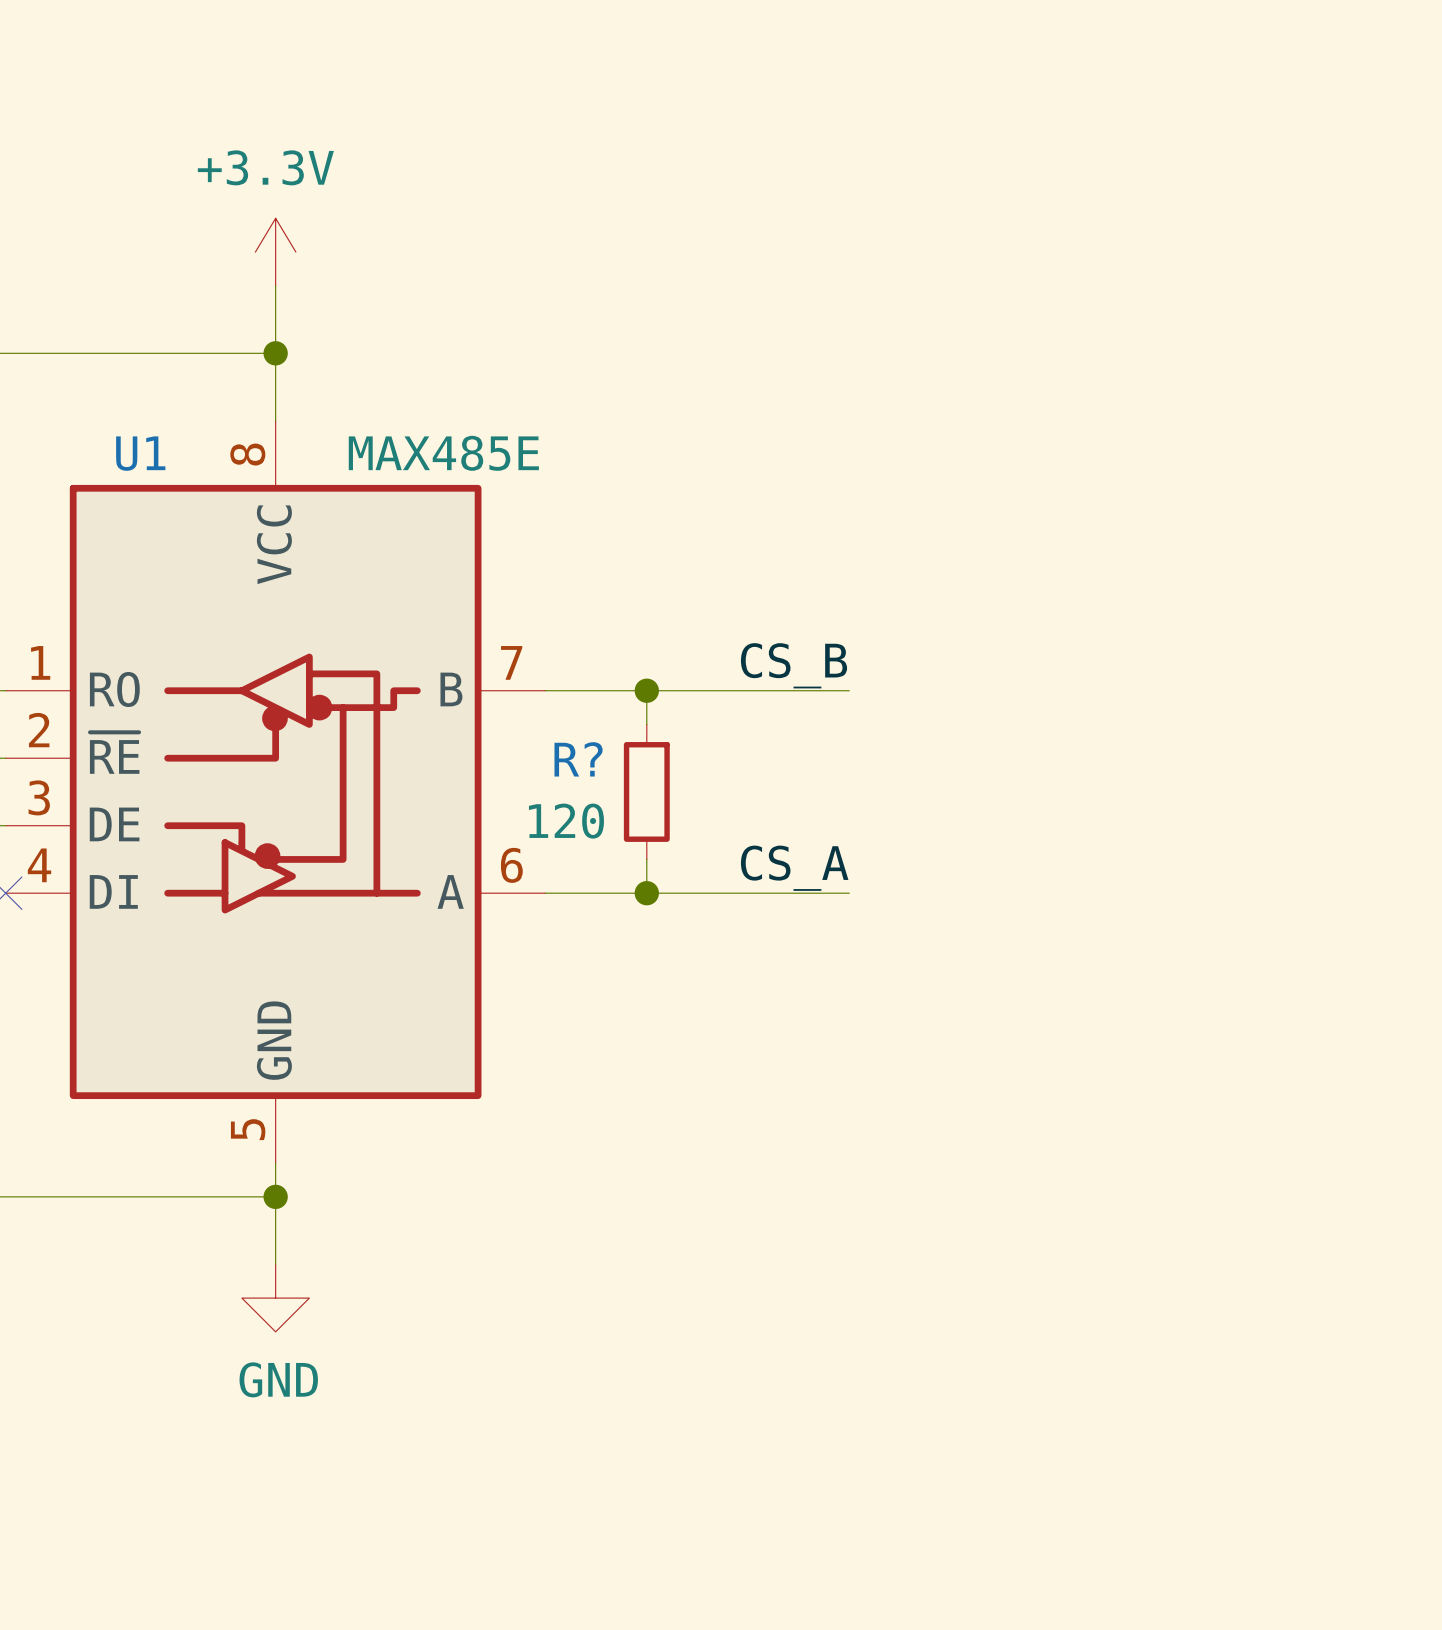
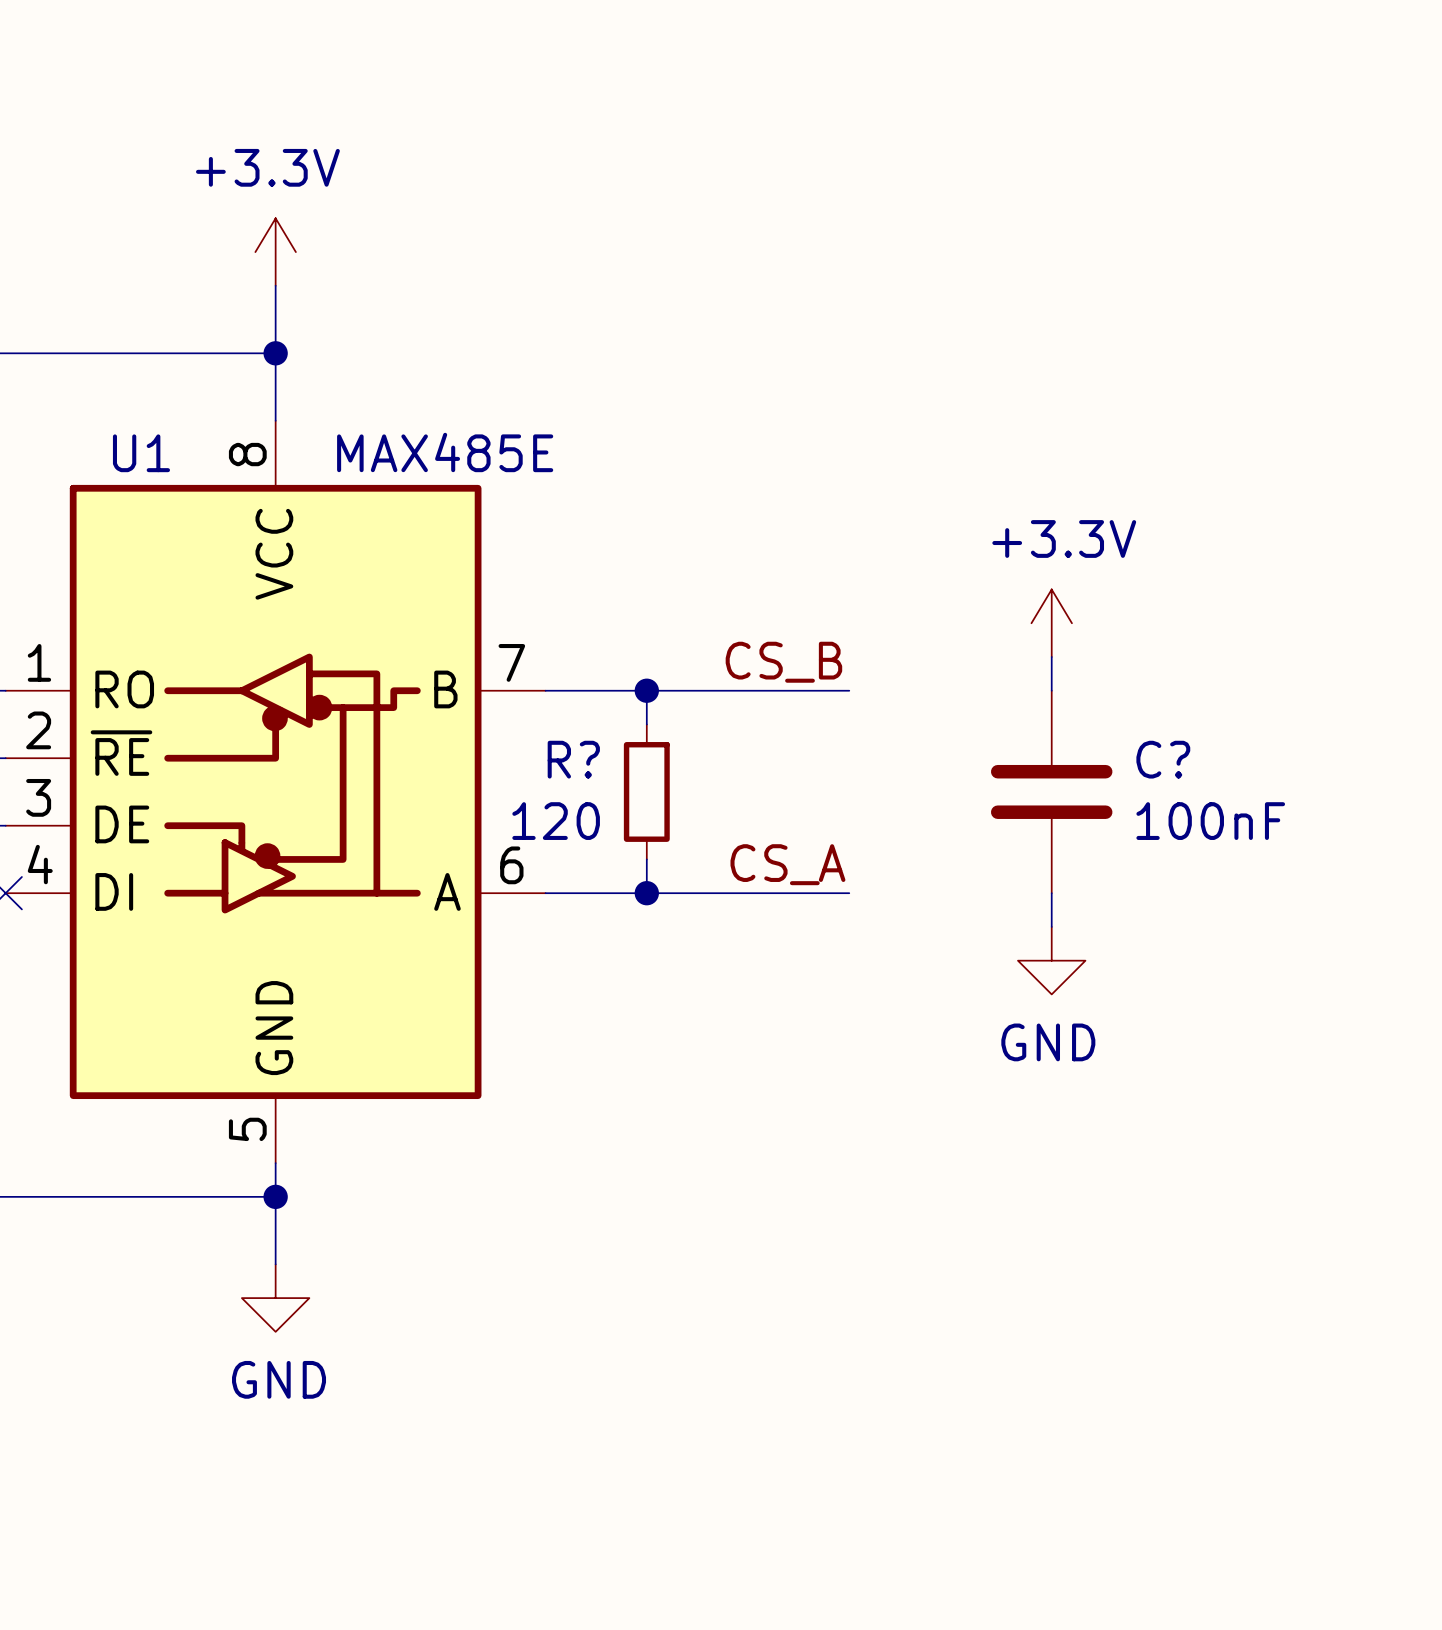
power symbol: none -> +3.3V (1051, 623)
wire: none -> (1051, 656) (1051, 690)
C?: none -> 100nF (1051, 791)
wire: none -> (1051, 893) (1051, 926)
power symbol: none -> GND (1051, 960)

